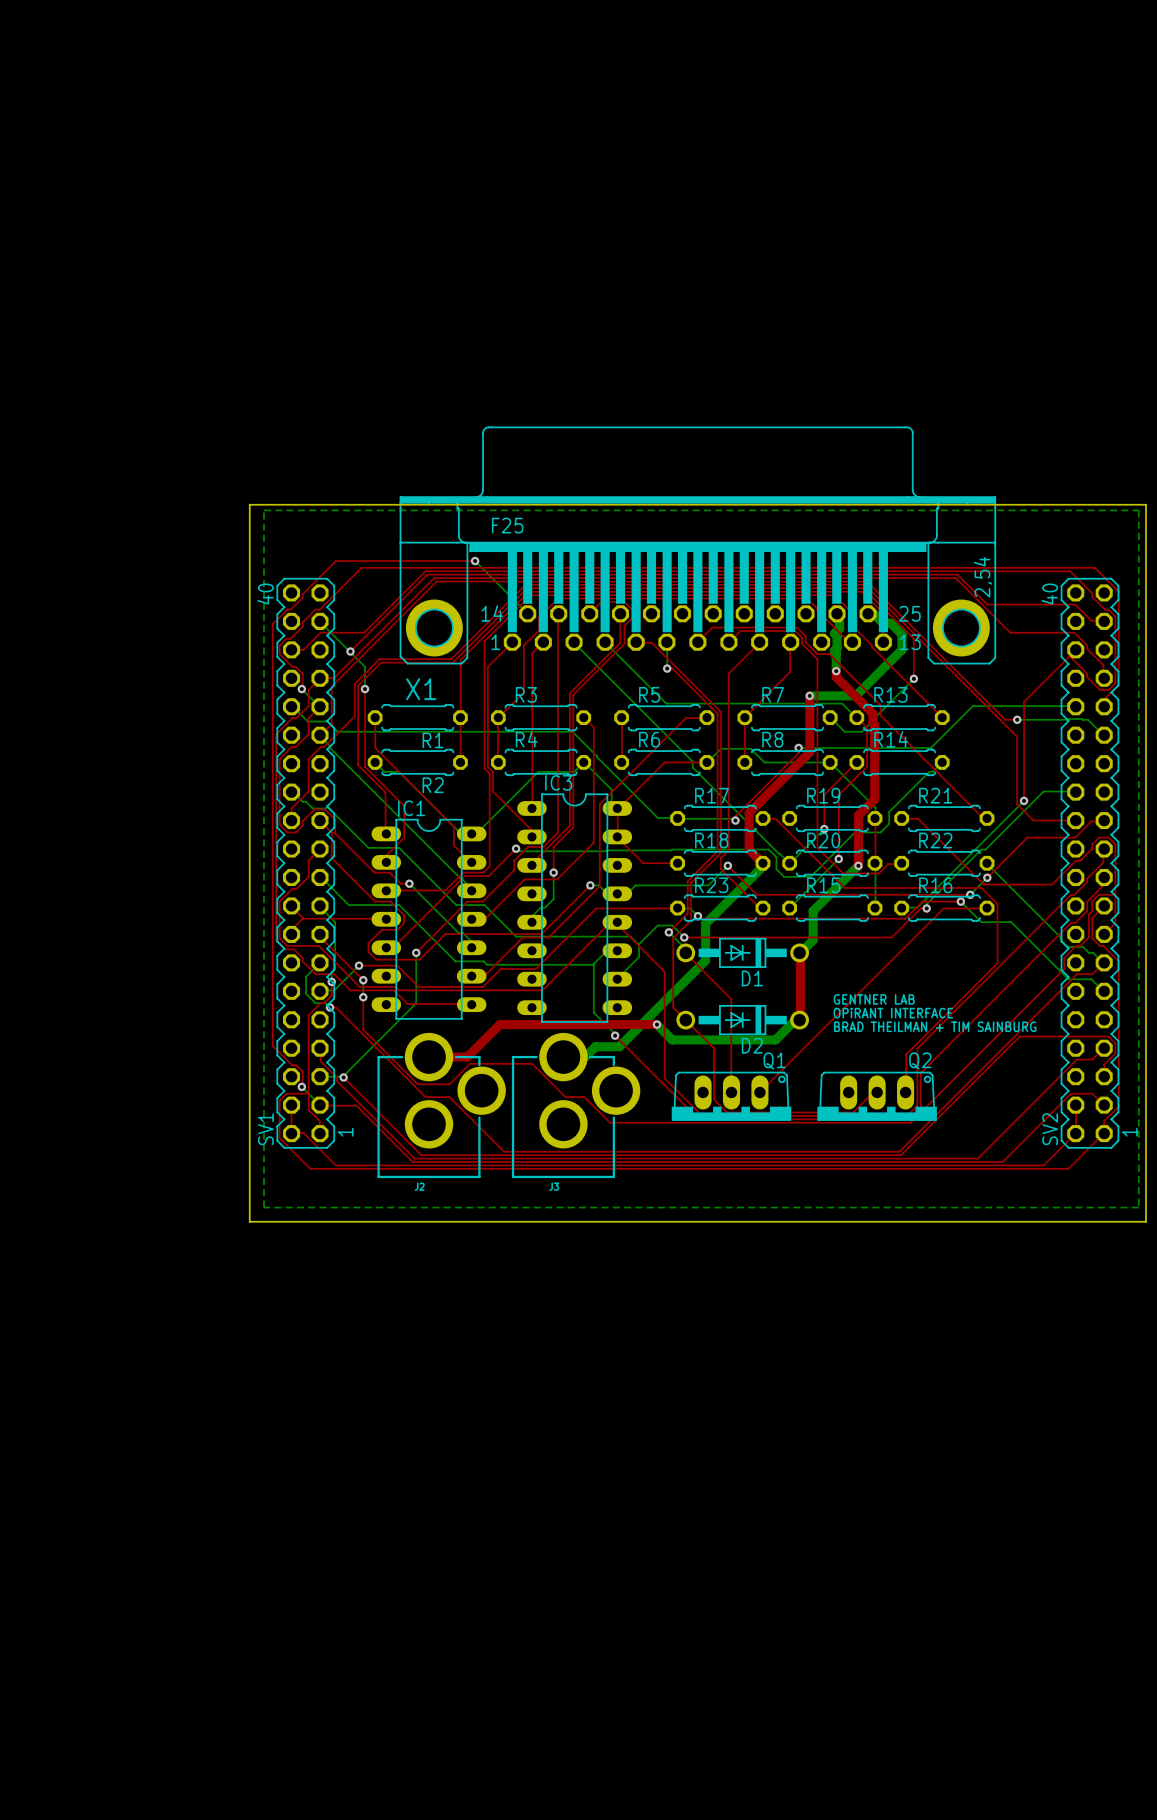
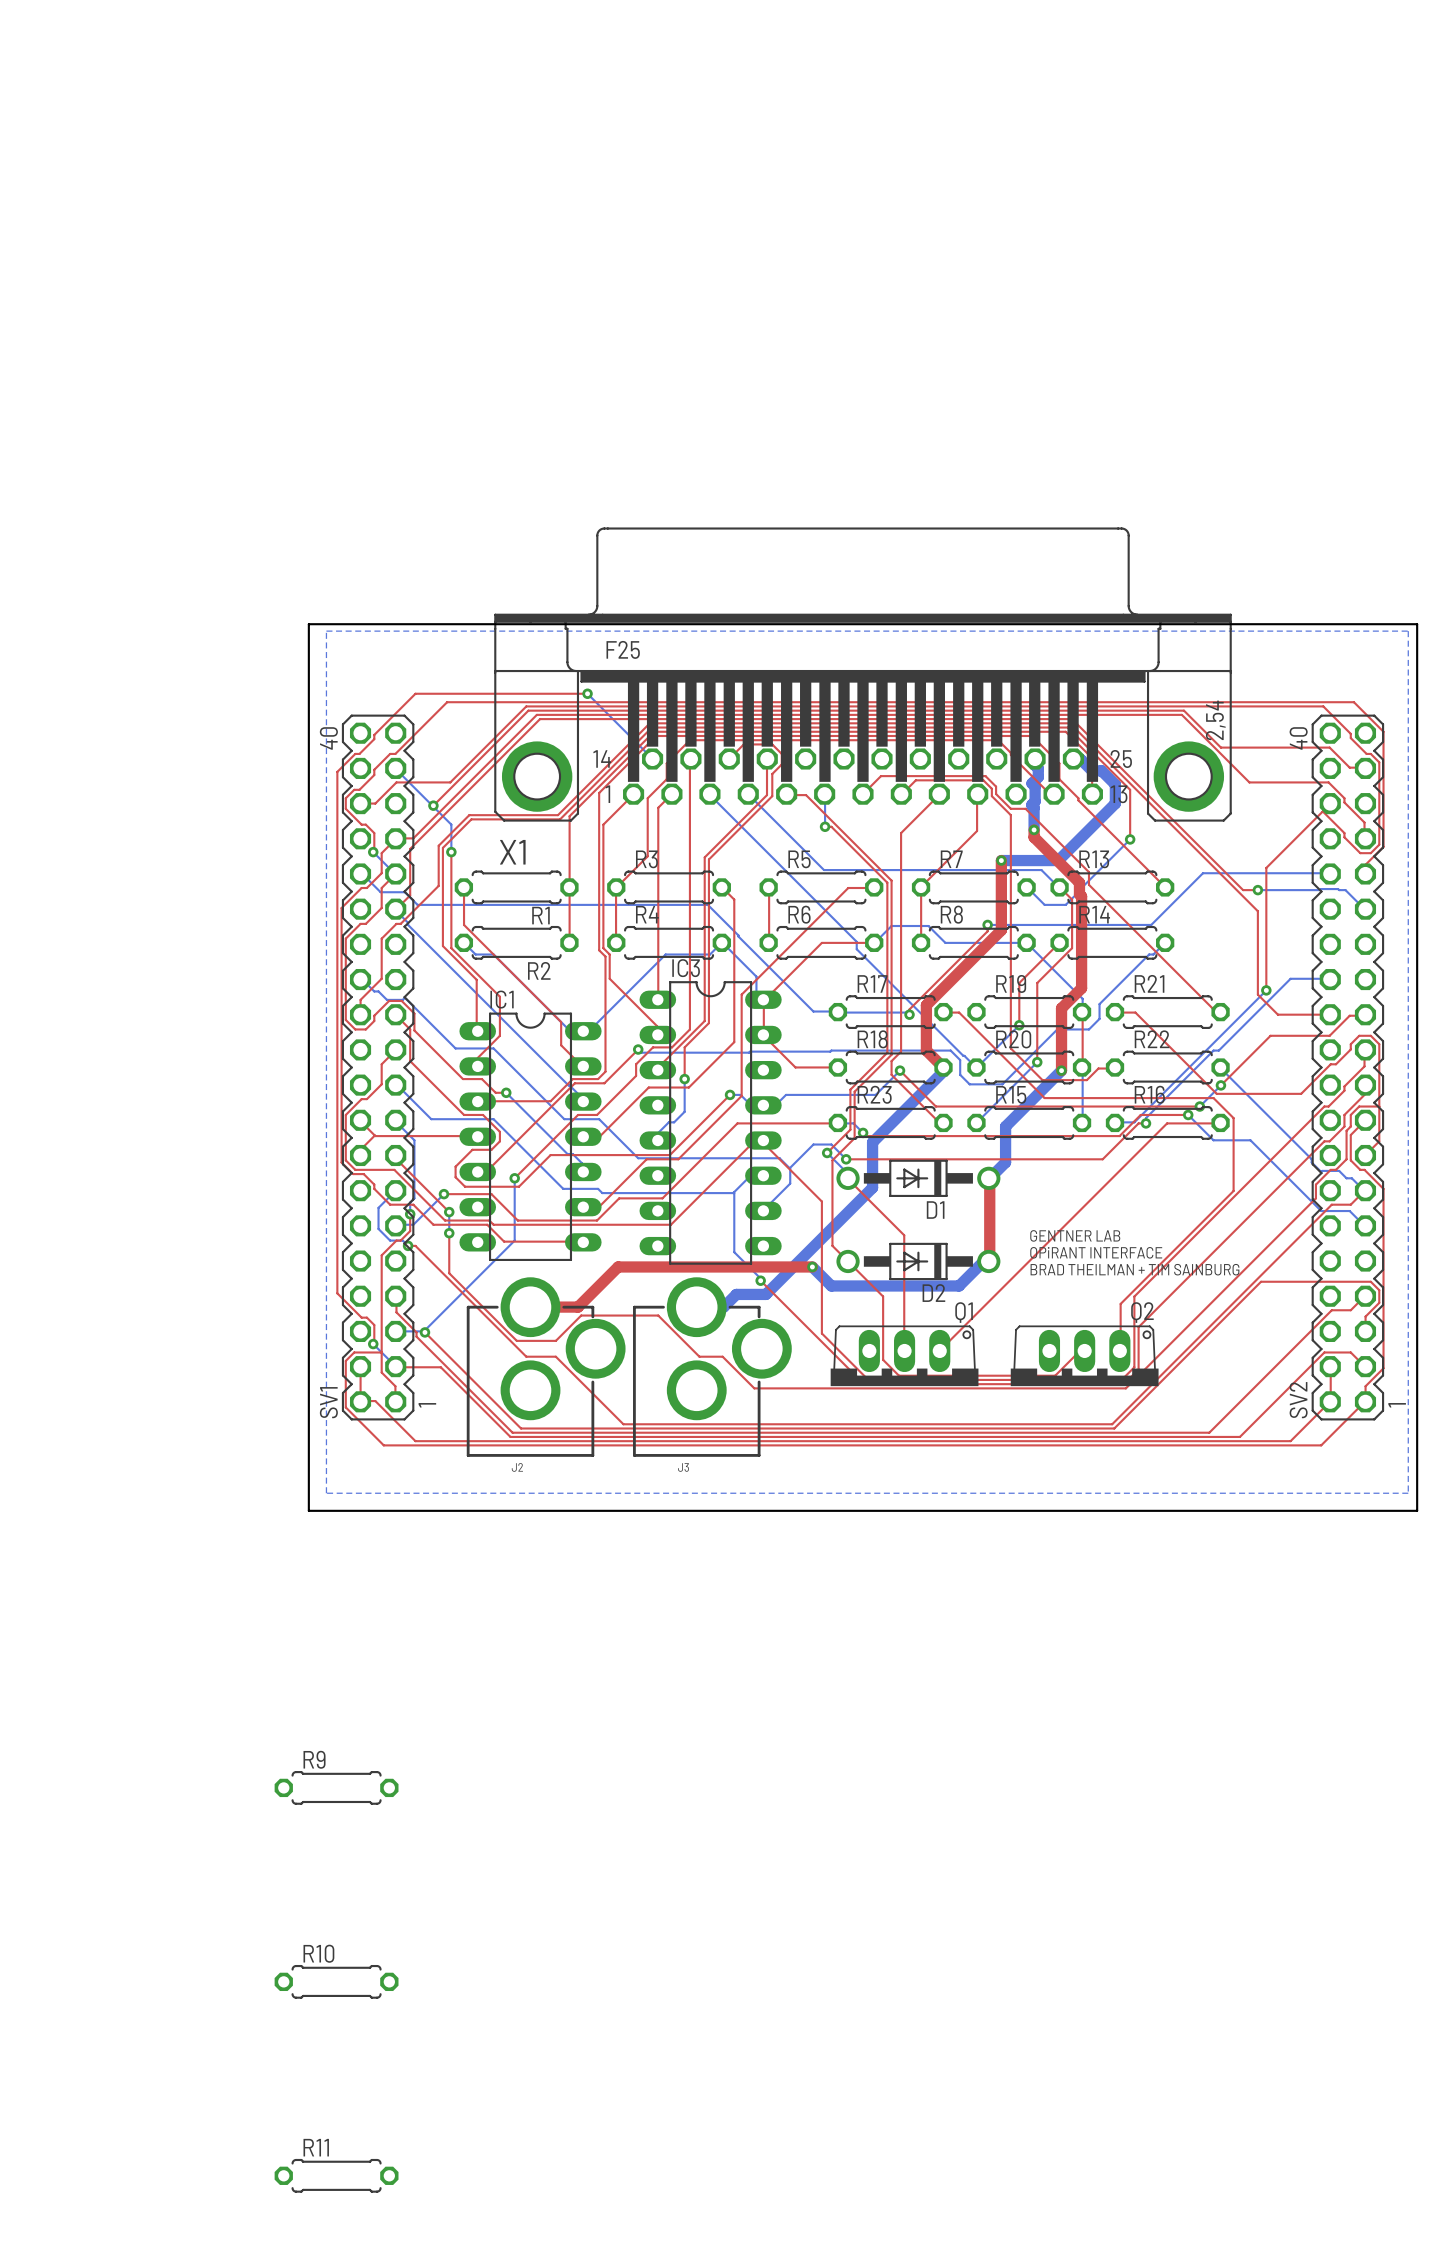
R9: none -> (336, 1787)
R10: none -> (336, 1981)
R11: none -> (336, 2175)

